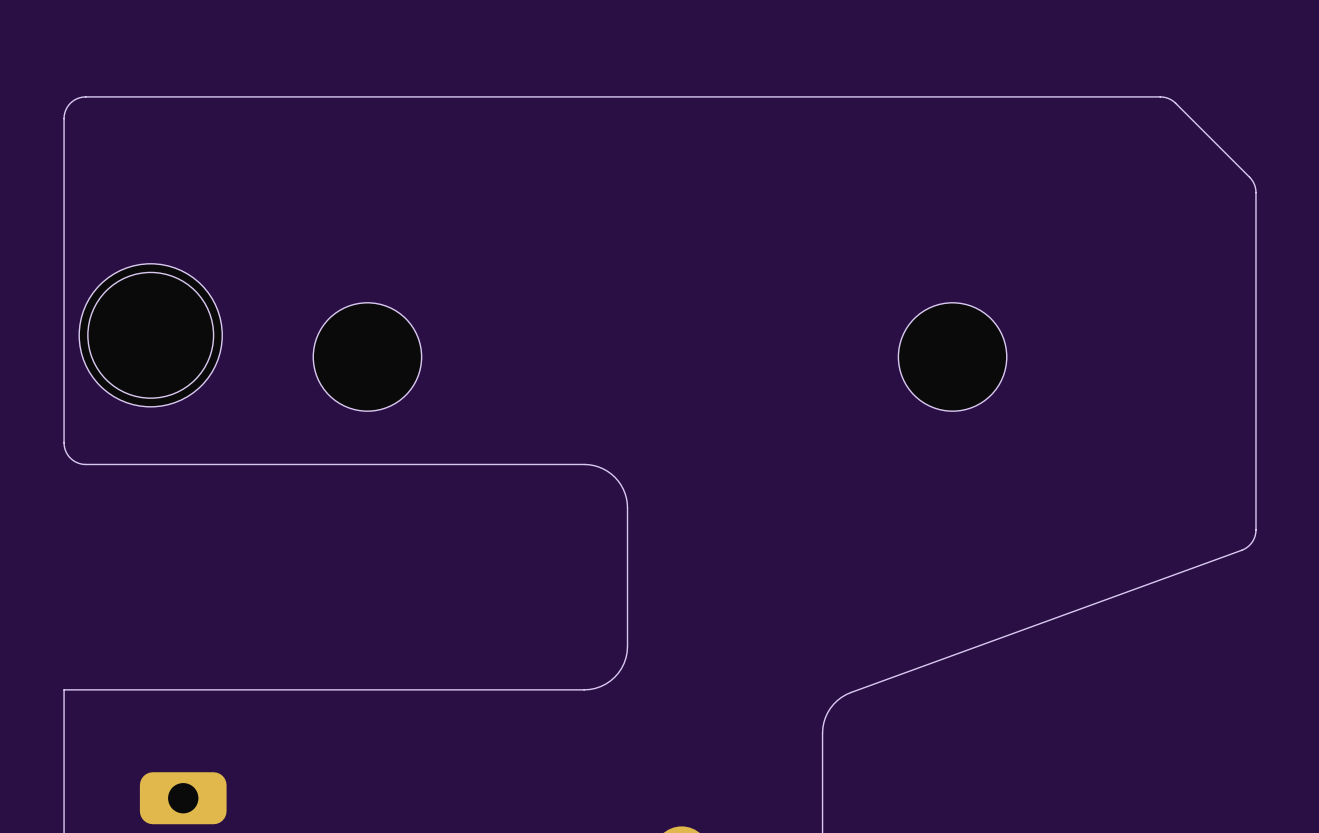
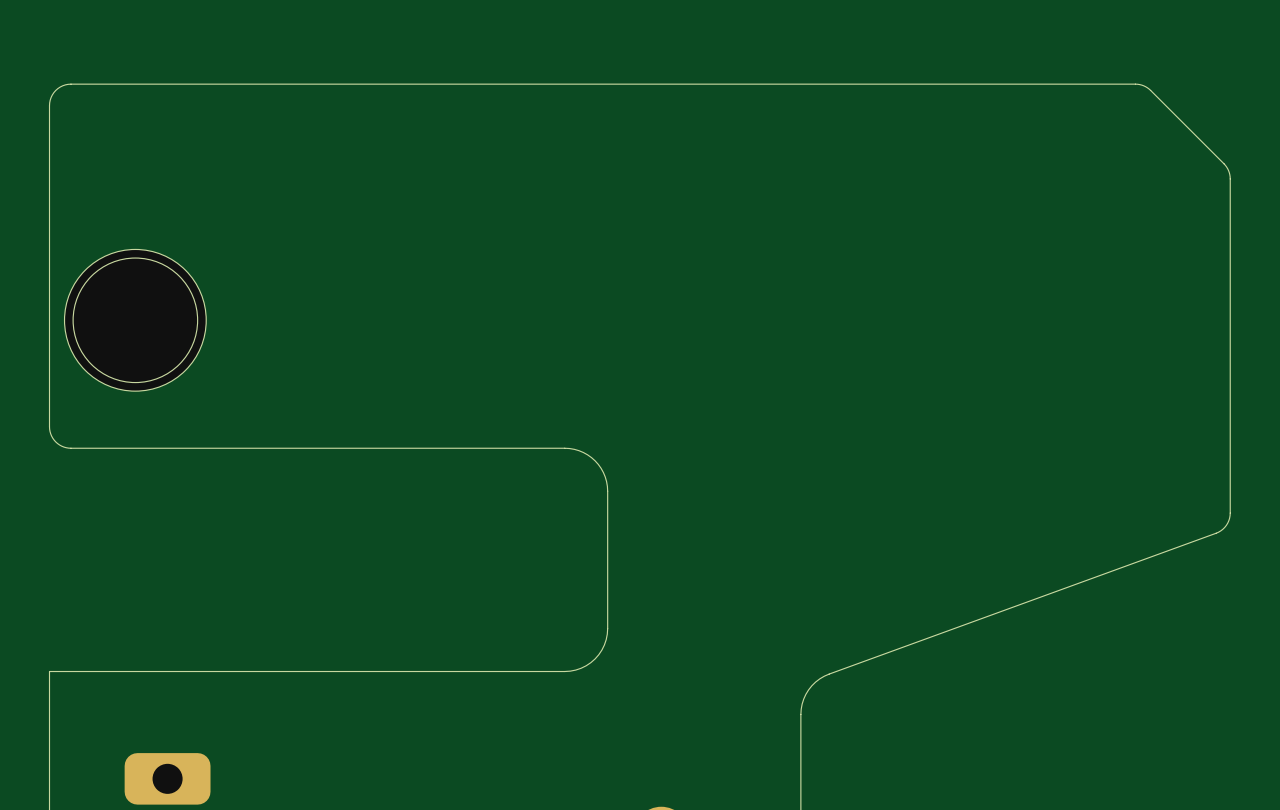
part: (367, 356) -> none
part: (952, 356) -> none

